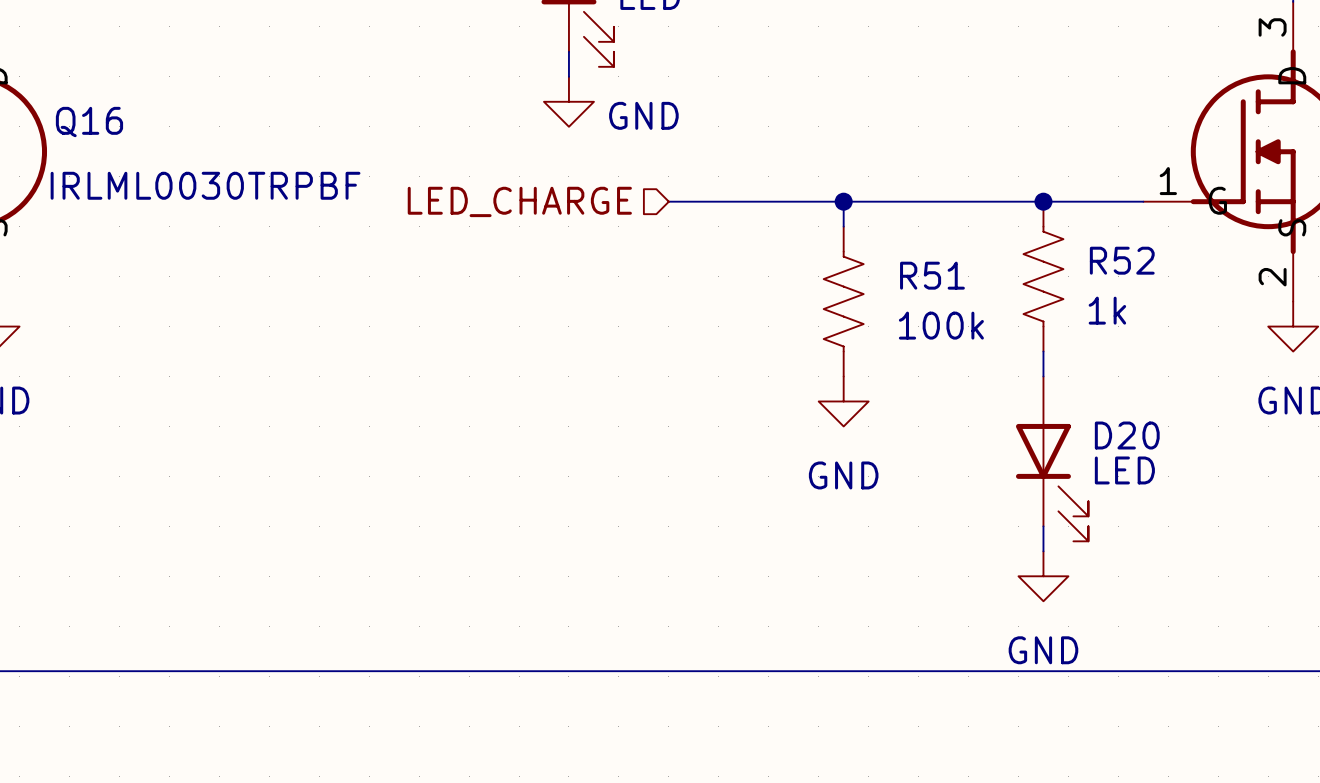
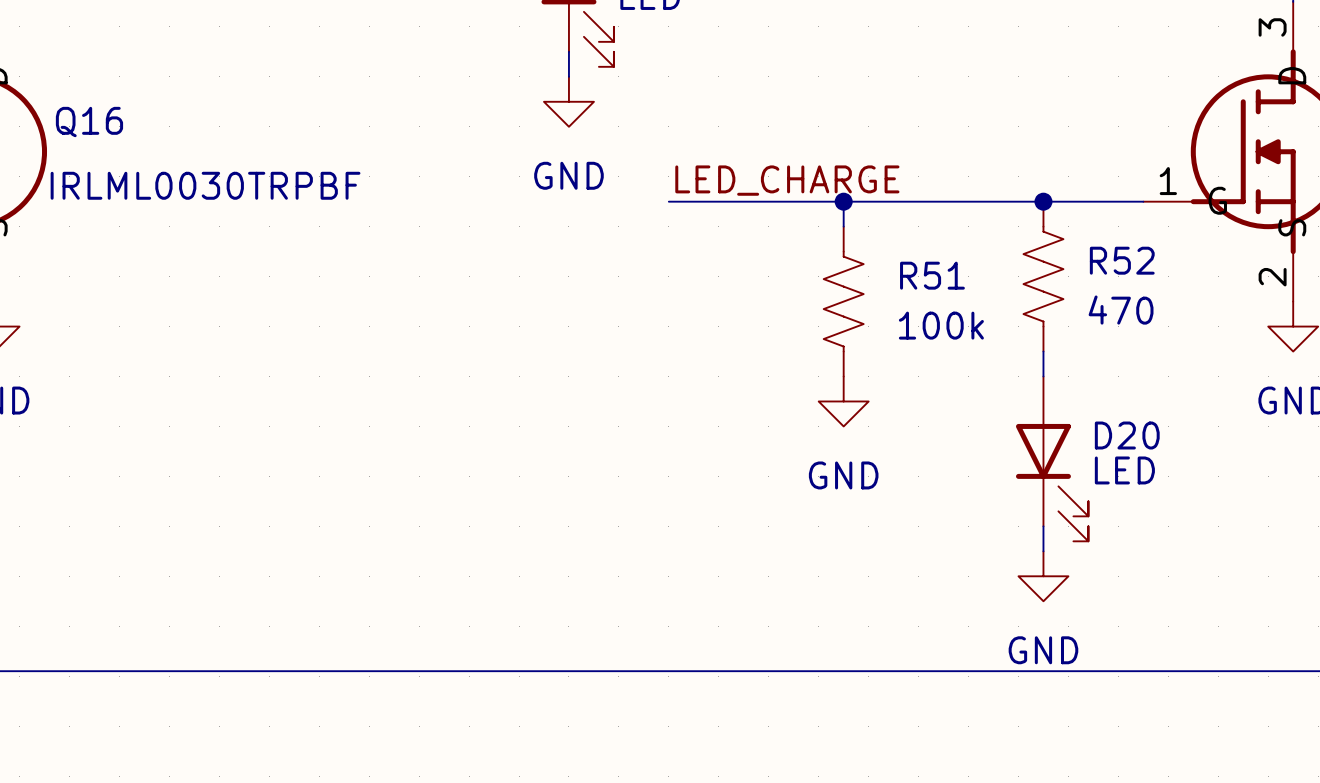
power symbol text position: GND (643, 115) -> GND (568, 175)
label: none -> LED_CHARGE (787, 180)
hierarchical label: LED_CHARGE (519, 201) -> none
R52 value: 1k (1107, 310) -> 470 (1121, 310)

